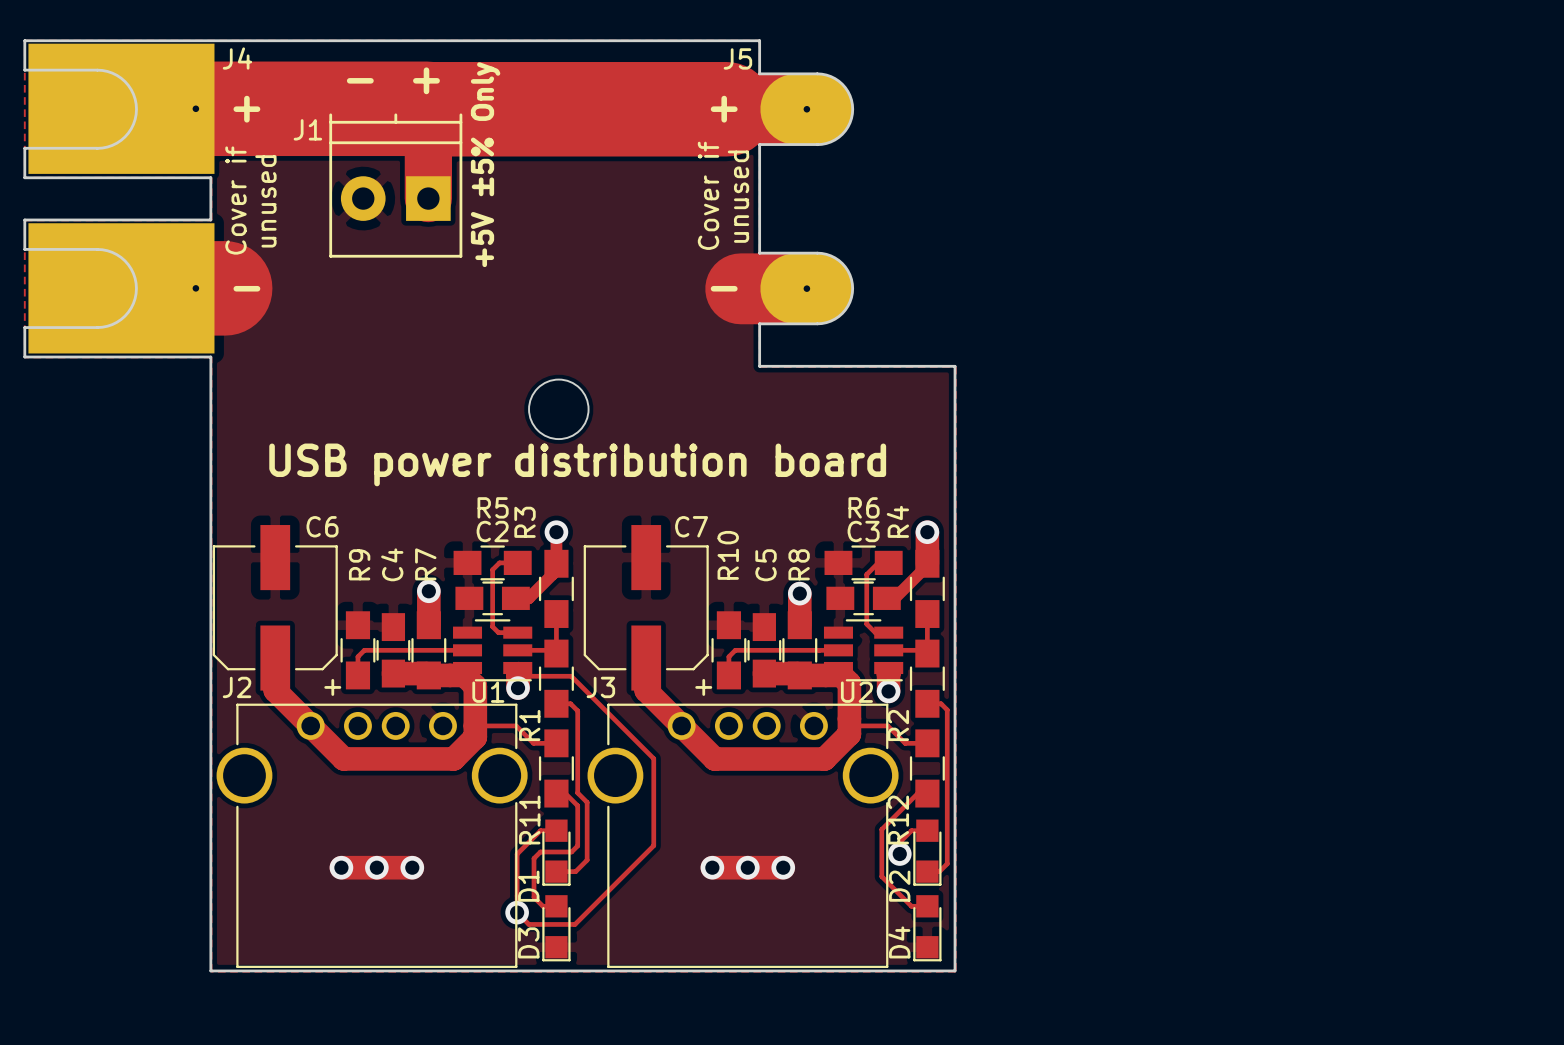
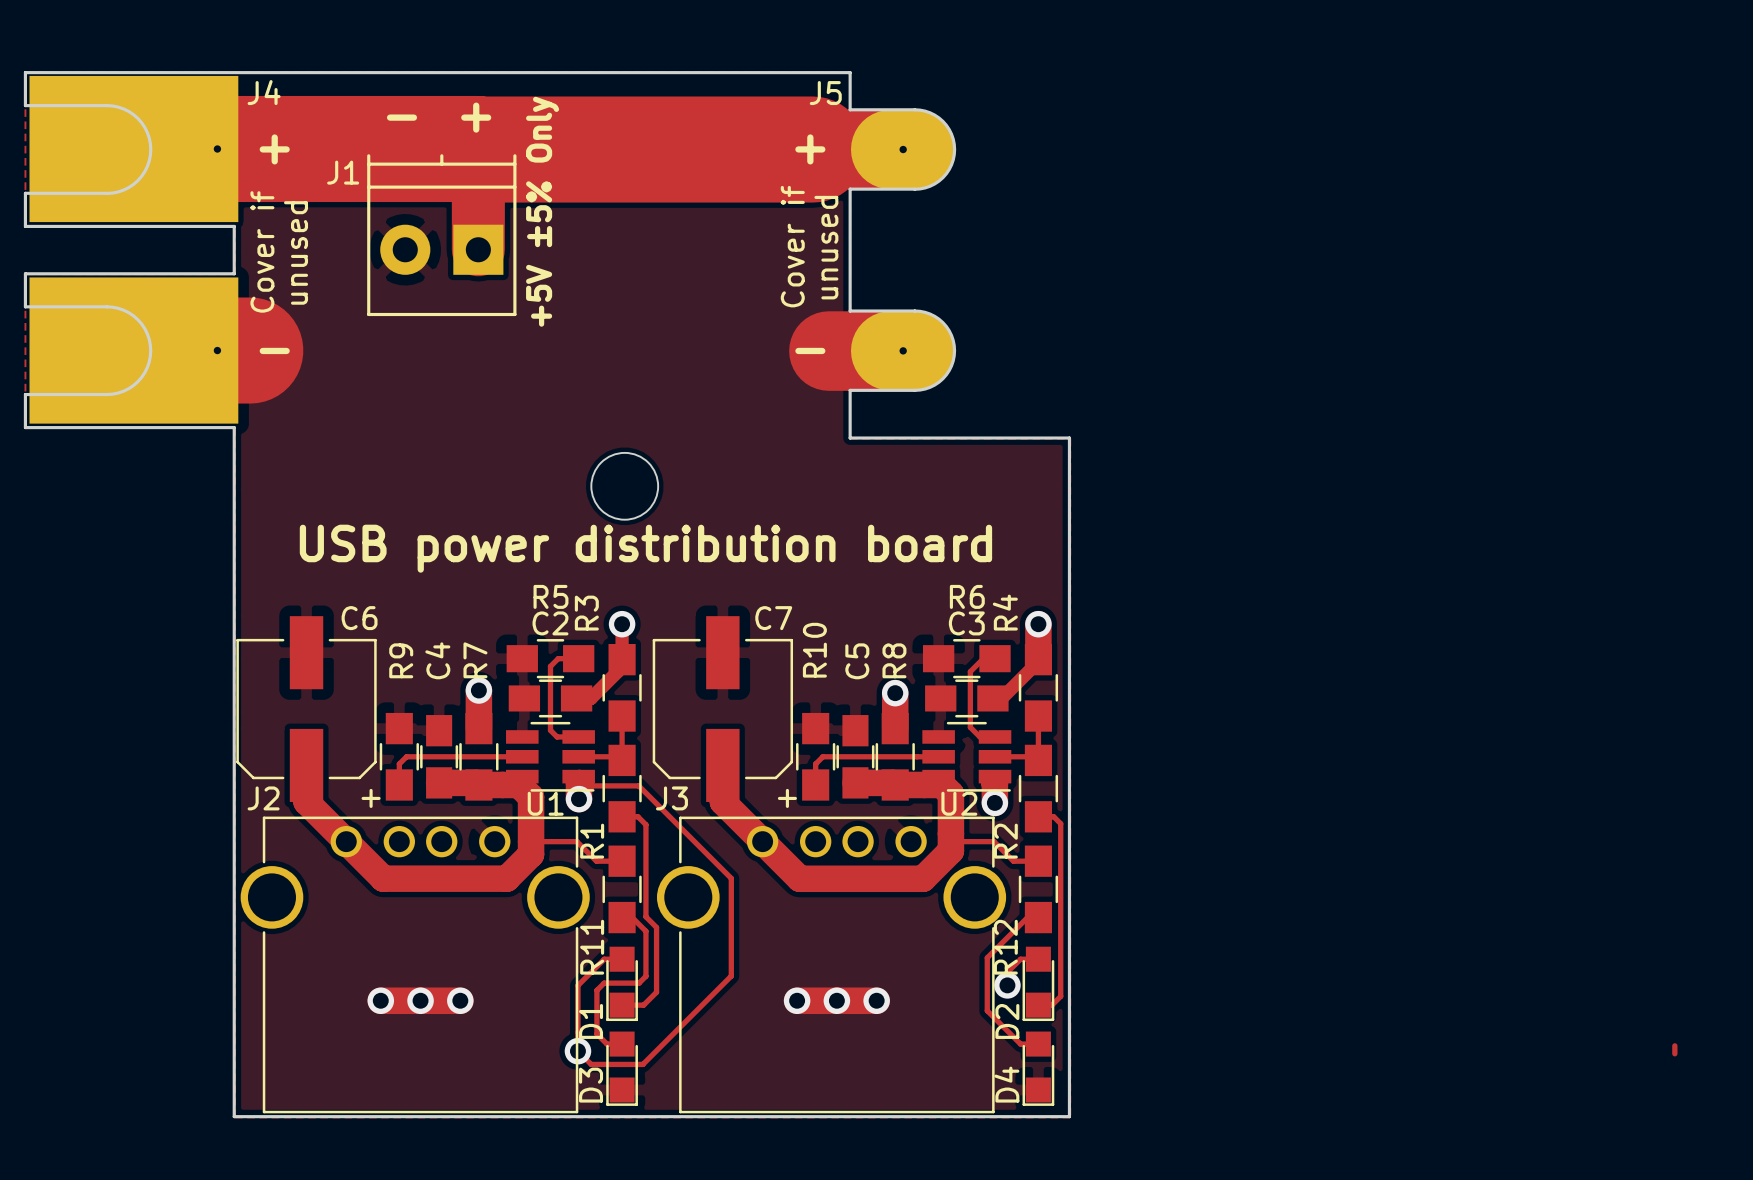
track: none -> (1674, 1045) (1674, 1053)

